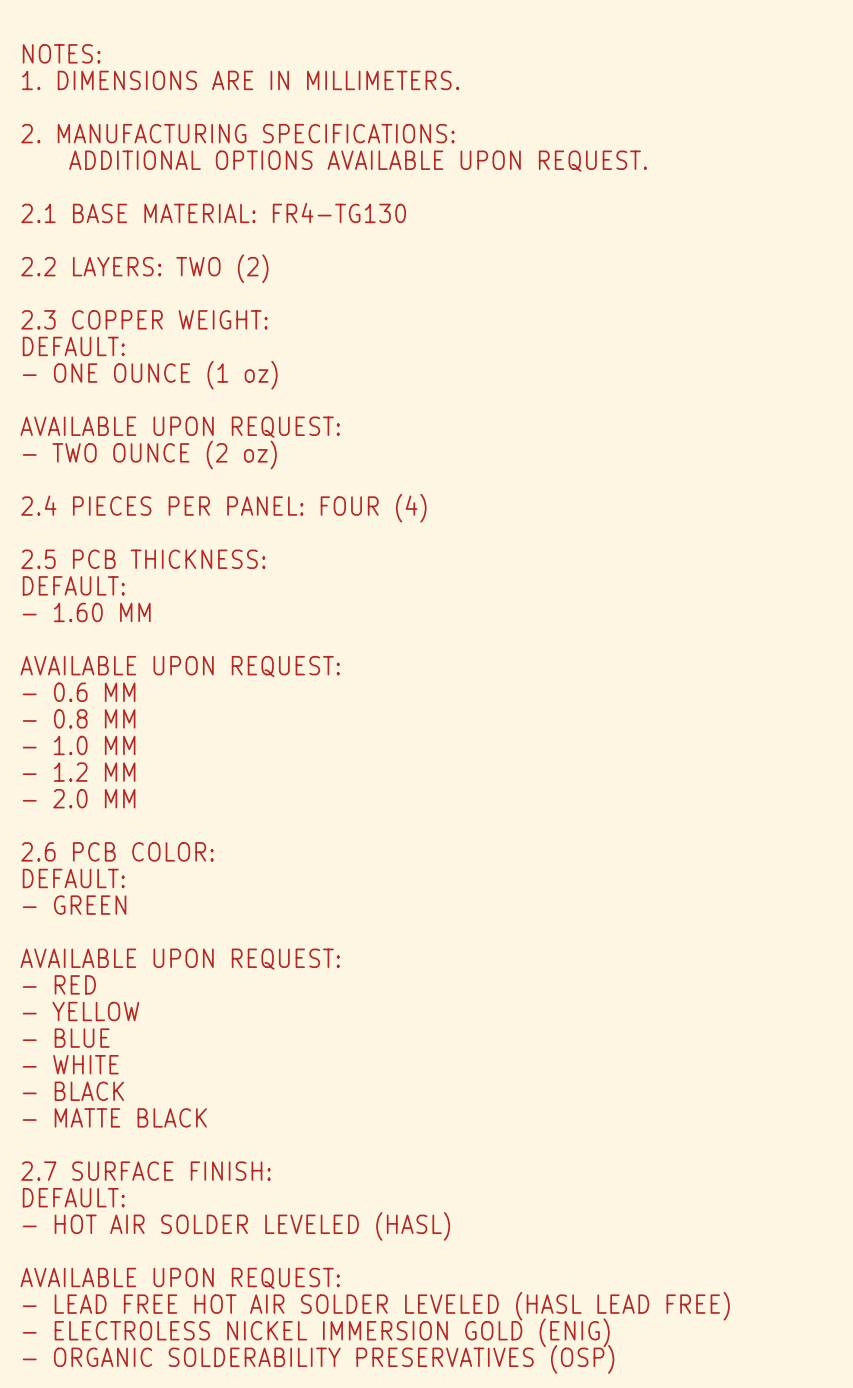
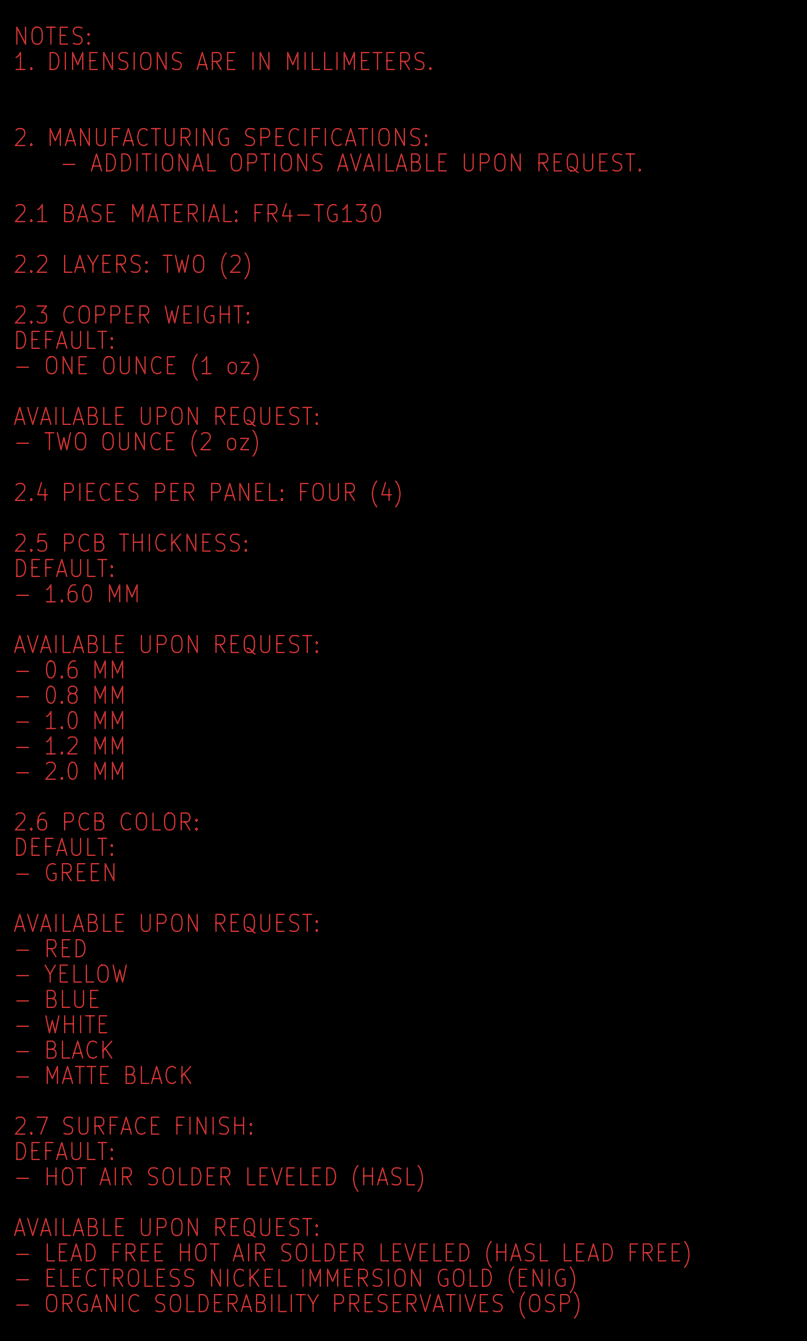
text: none -> NOTES: (53, 35)
text: NOTES: (61, 53) -> 1. DIMENSIONS ARE IN MILLIMETERS. (223, 61)
text: 1. DIMENSIONS ARE IN MILLIMETERS. (240, 80) -> none
text: ADDITIONAL OPTIONS AVAILABLE UPON REQUEST. (358, 161) -> - ADDITIONAL OPTIONS AVAILABLE UPON REQUEST. (351, 163)

